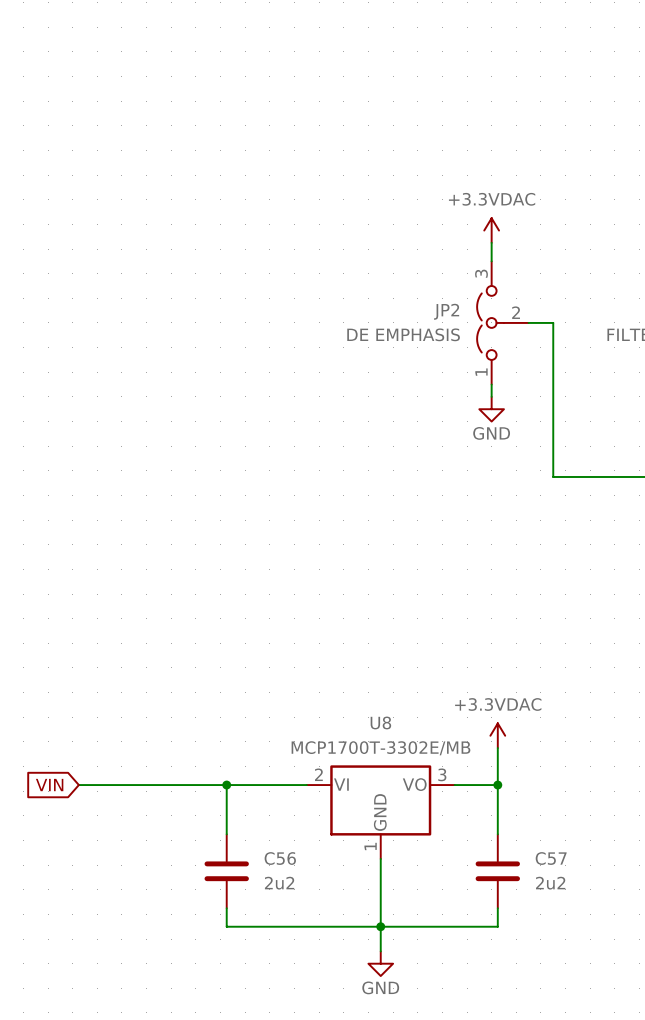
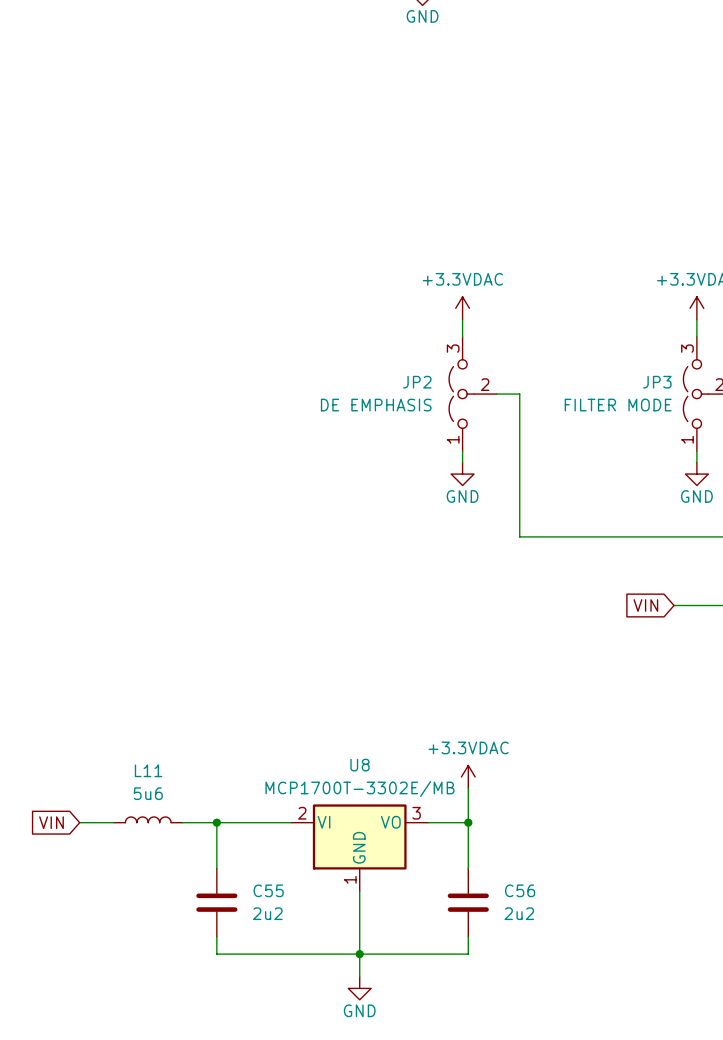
L11: none -> 5u6 (148, 819)
wire: (115, 785) (189, 785) -> none
C56 name: C56 (280, 858) -> C55 (268, 890)
C57 name: C57 (551, 858) -> C56 (520, 890)

